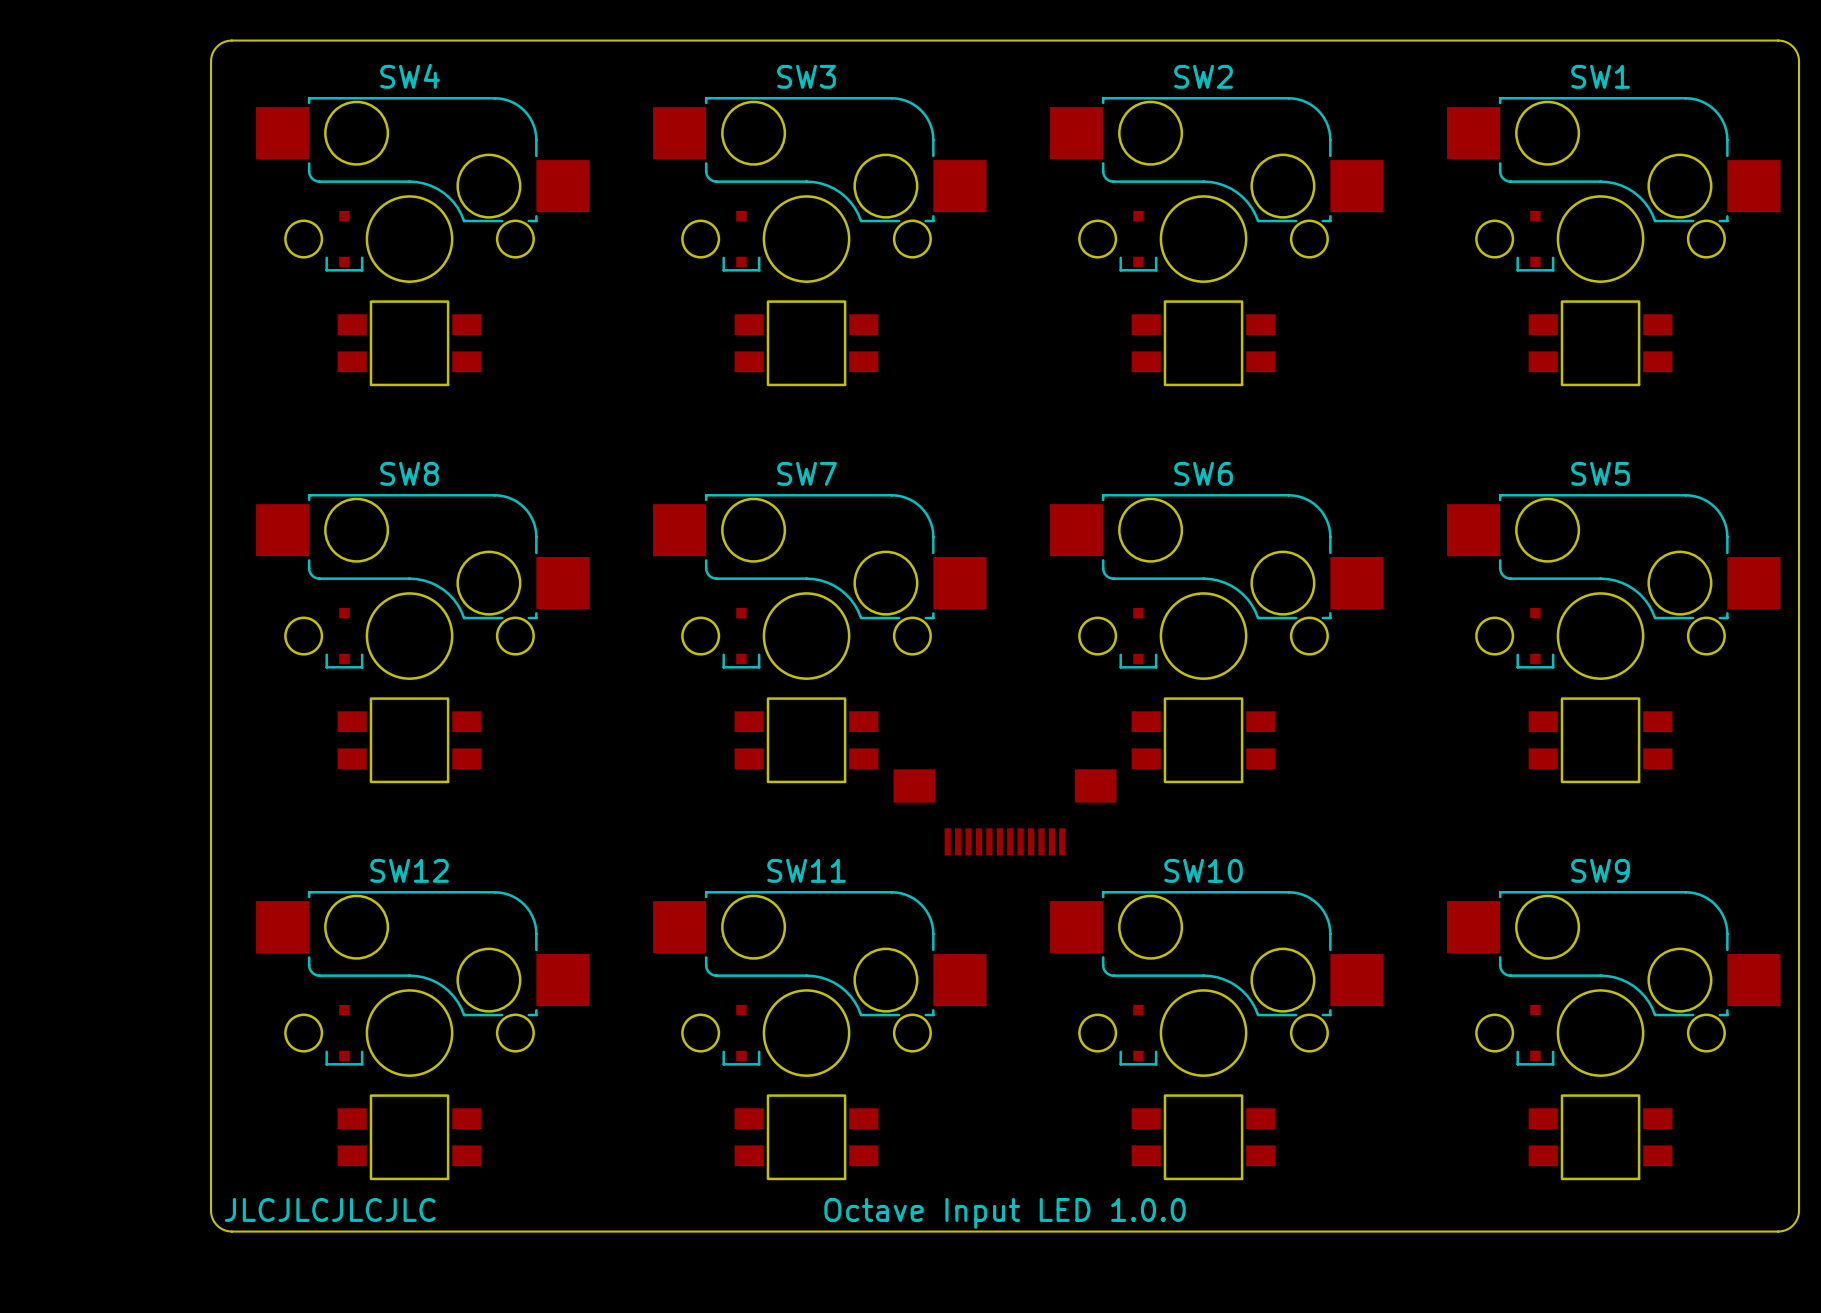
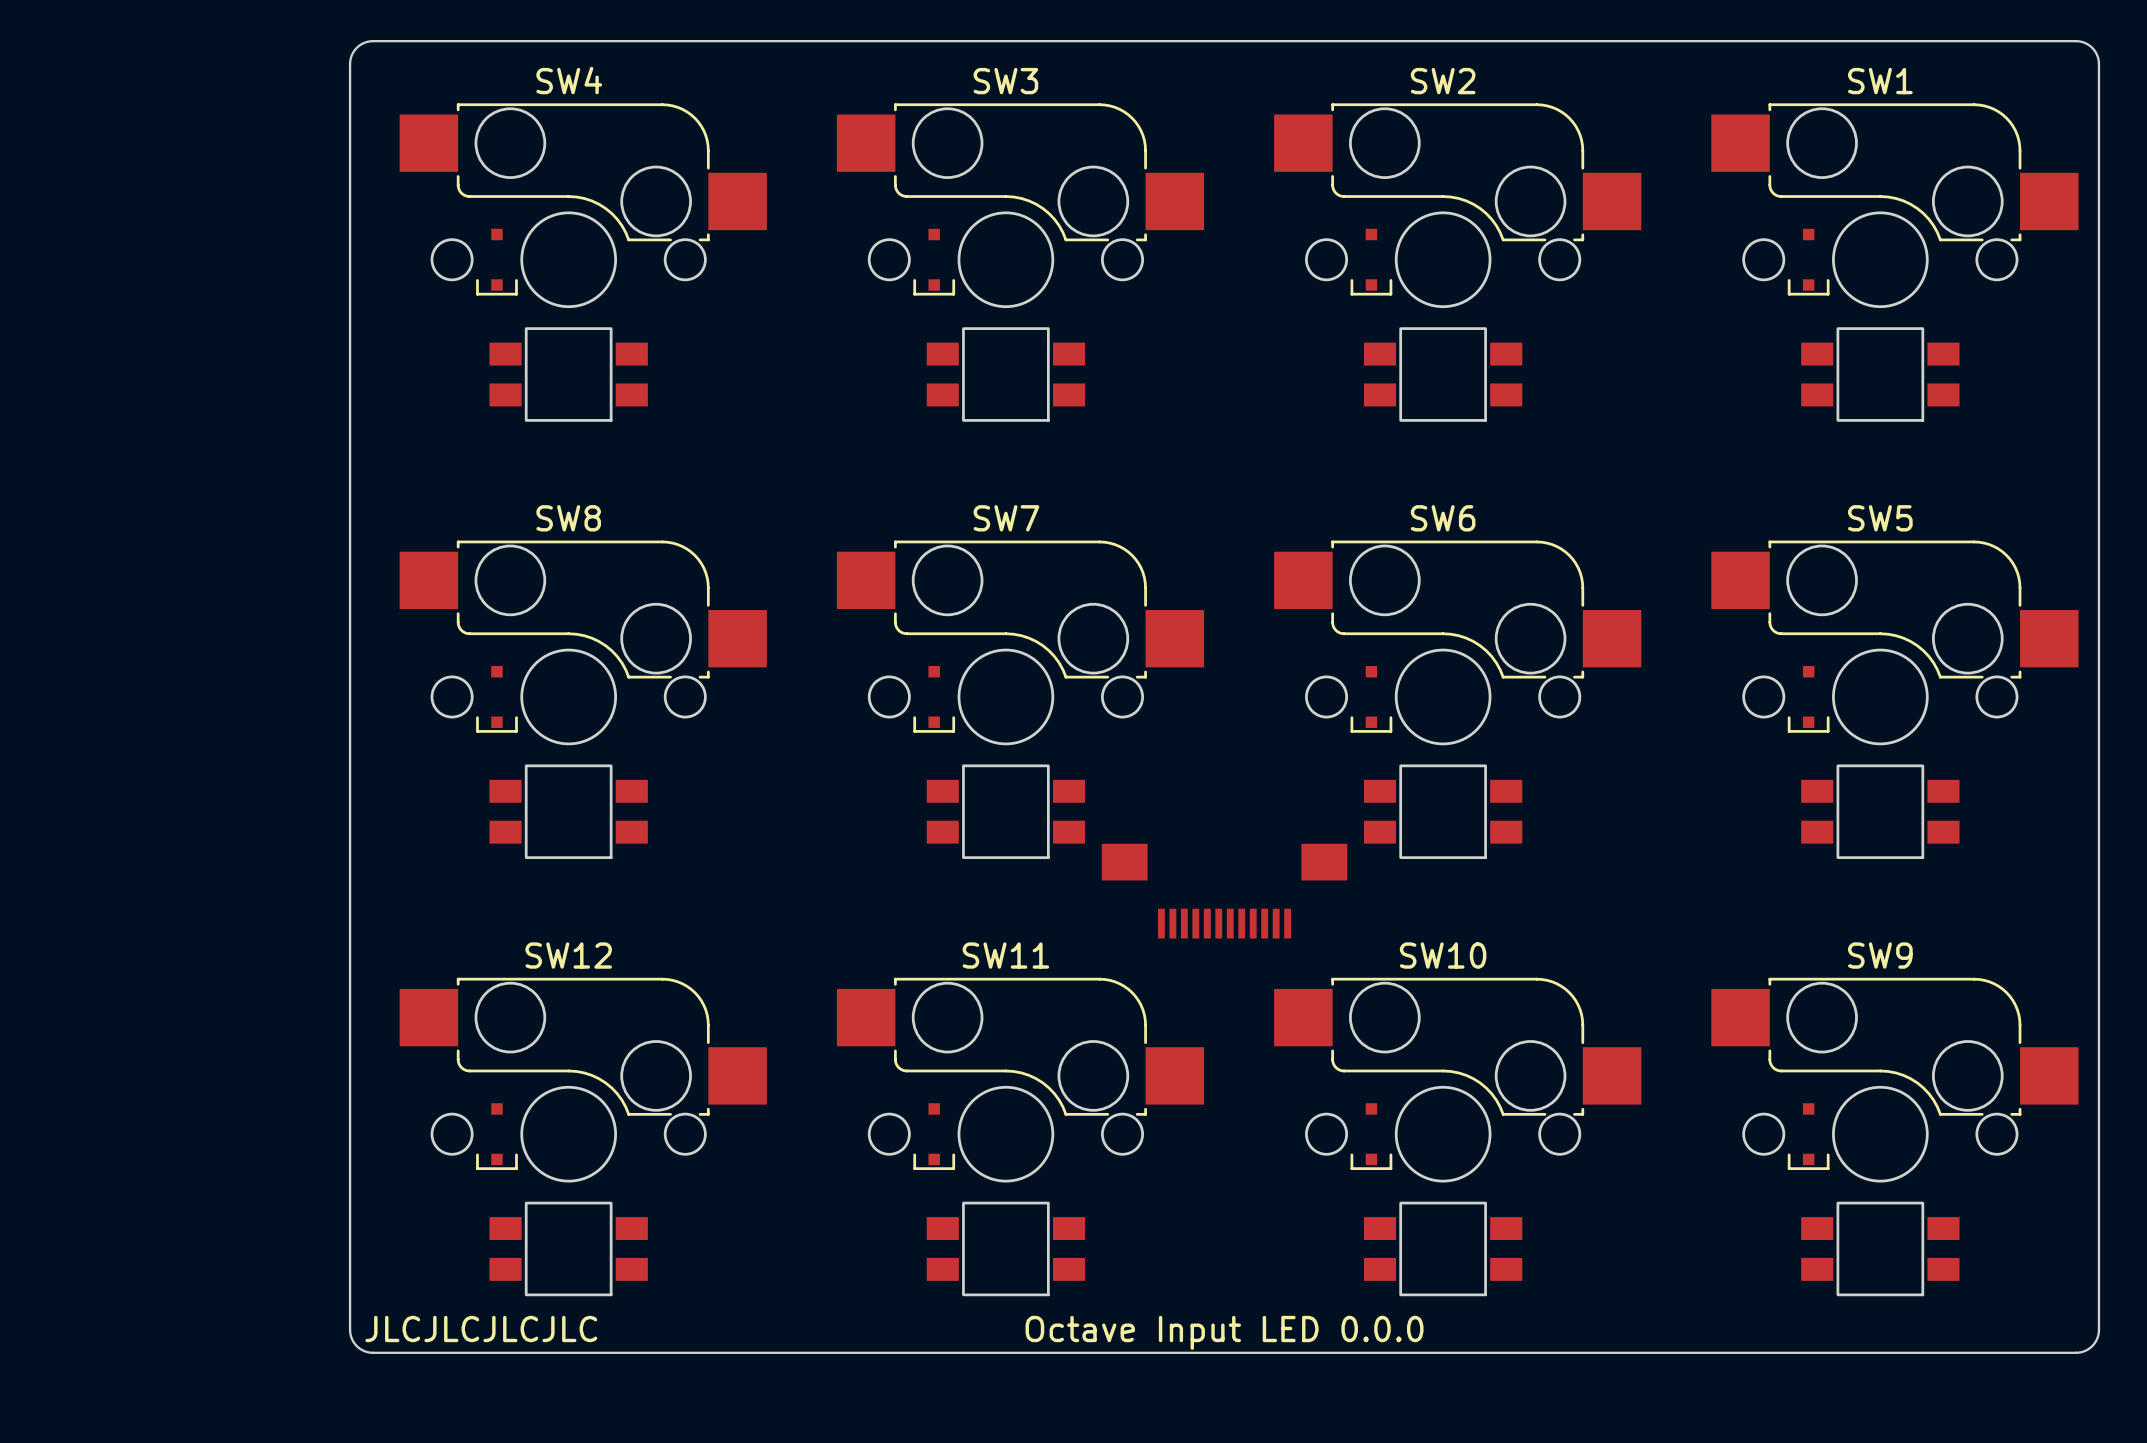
text: Octave Input LED 1.0.0 (1005, 1213) -> Octave Input LED 0.0.0 (1224, 1332)

